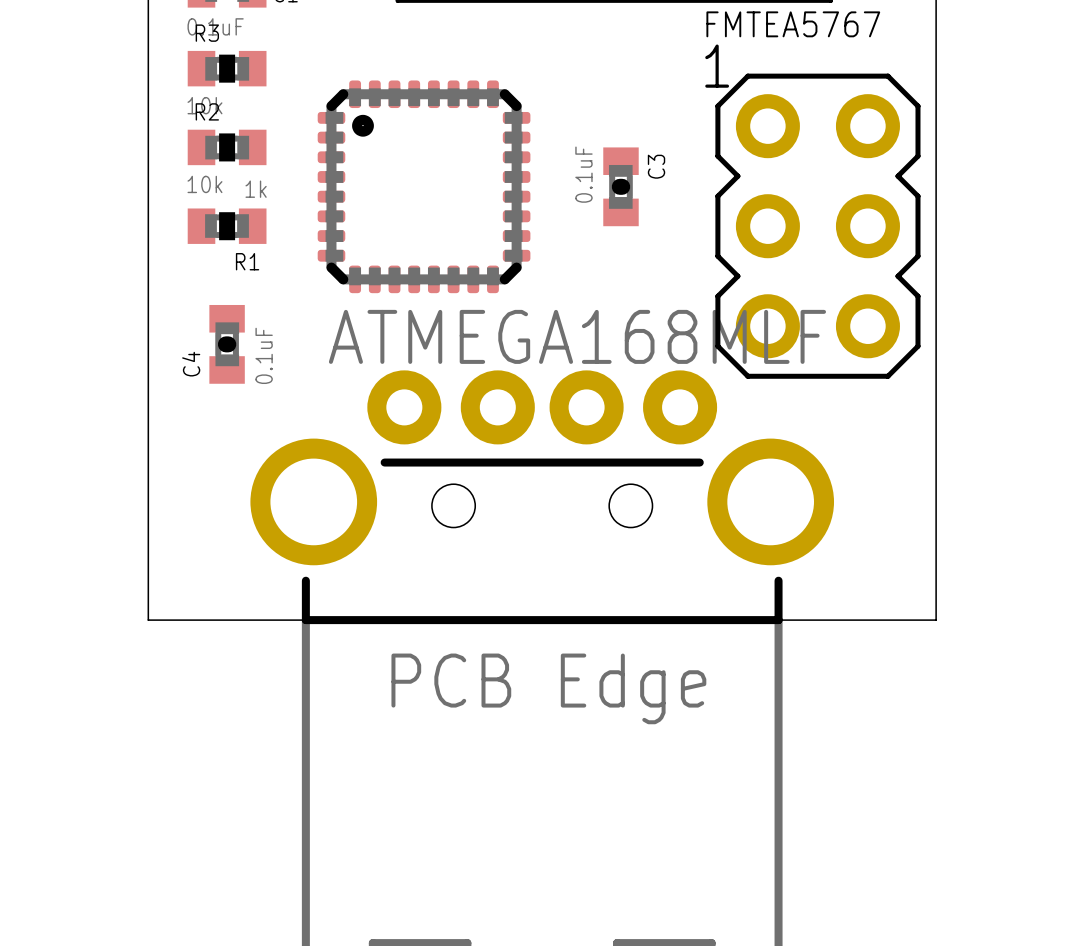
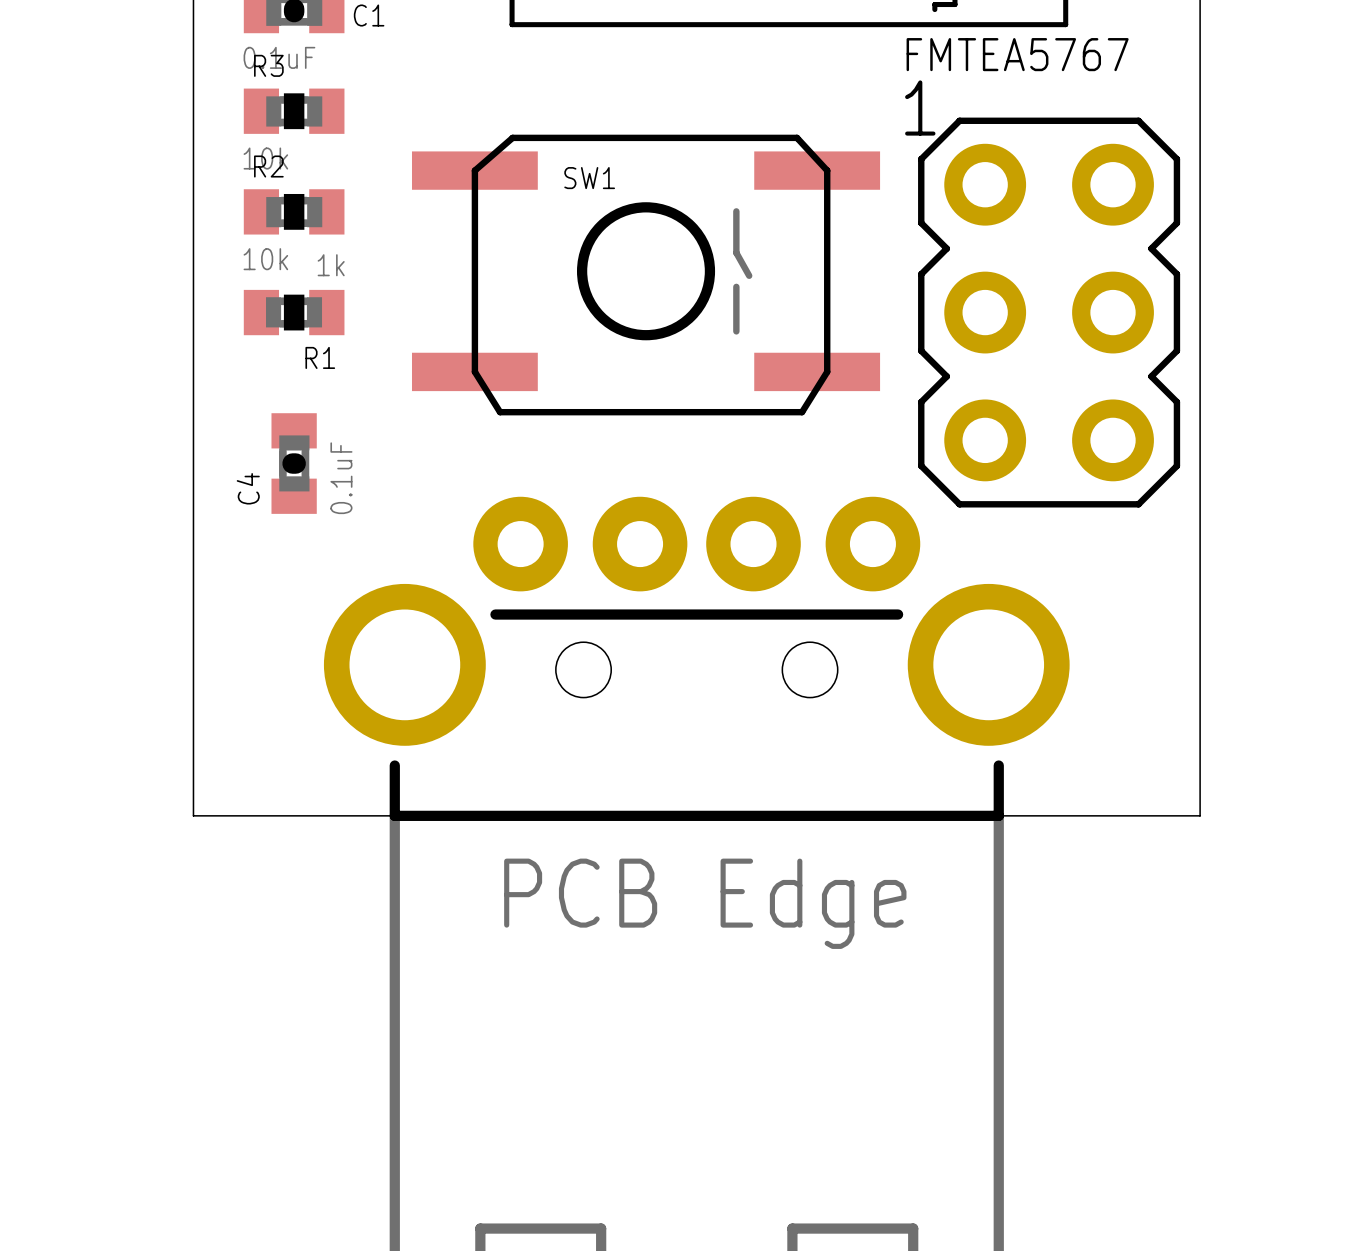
part: ATMEGA168MLF (424, 186) -> none
C3: 0.1uF (620, 186) -> none
SW1: none -> (646, 275)

